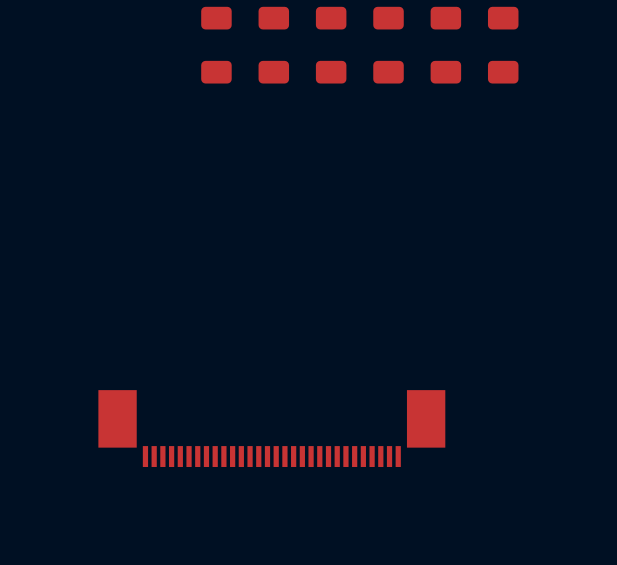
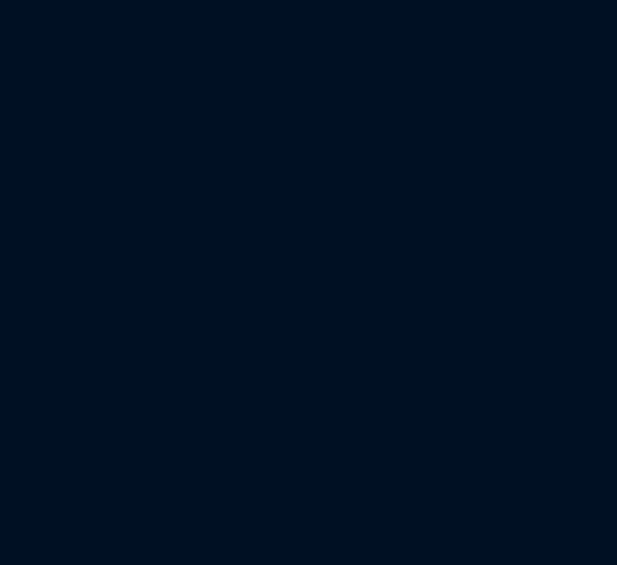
part: (216, 45) -> none
part: (273, 45) -> none
part: (331, 45) -> none
part: (388, 45) -> none
part: (445, 45) -> none
part: (503, 45) -> none
part: (271, 428) -> none

